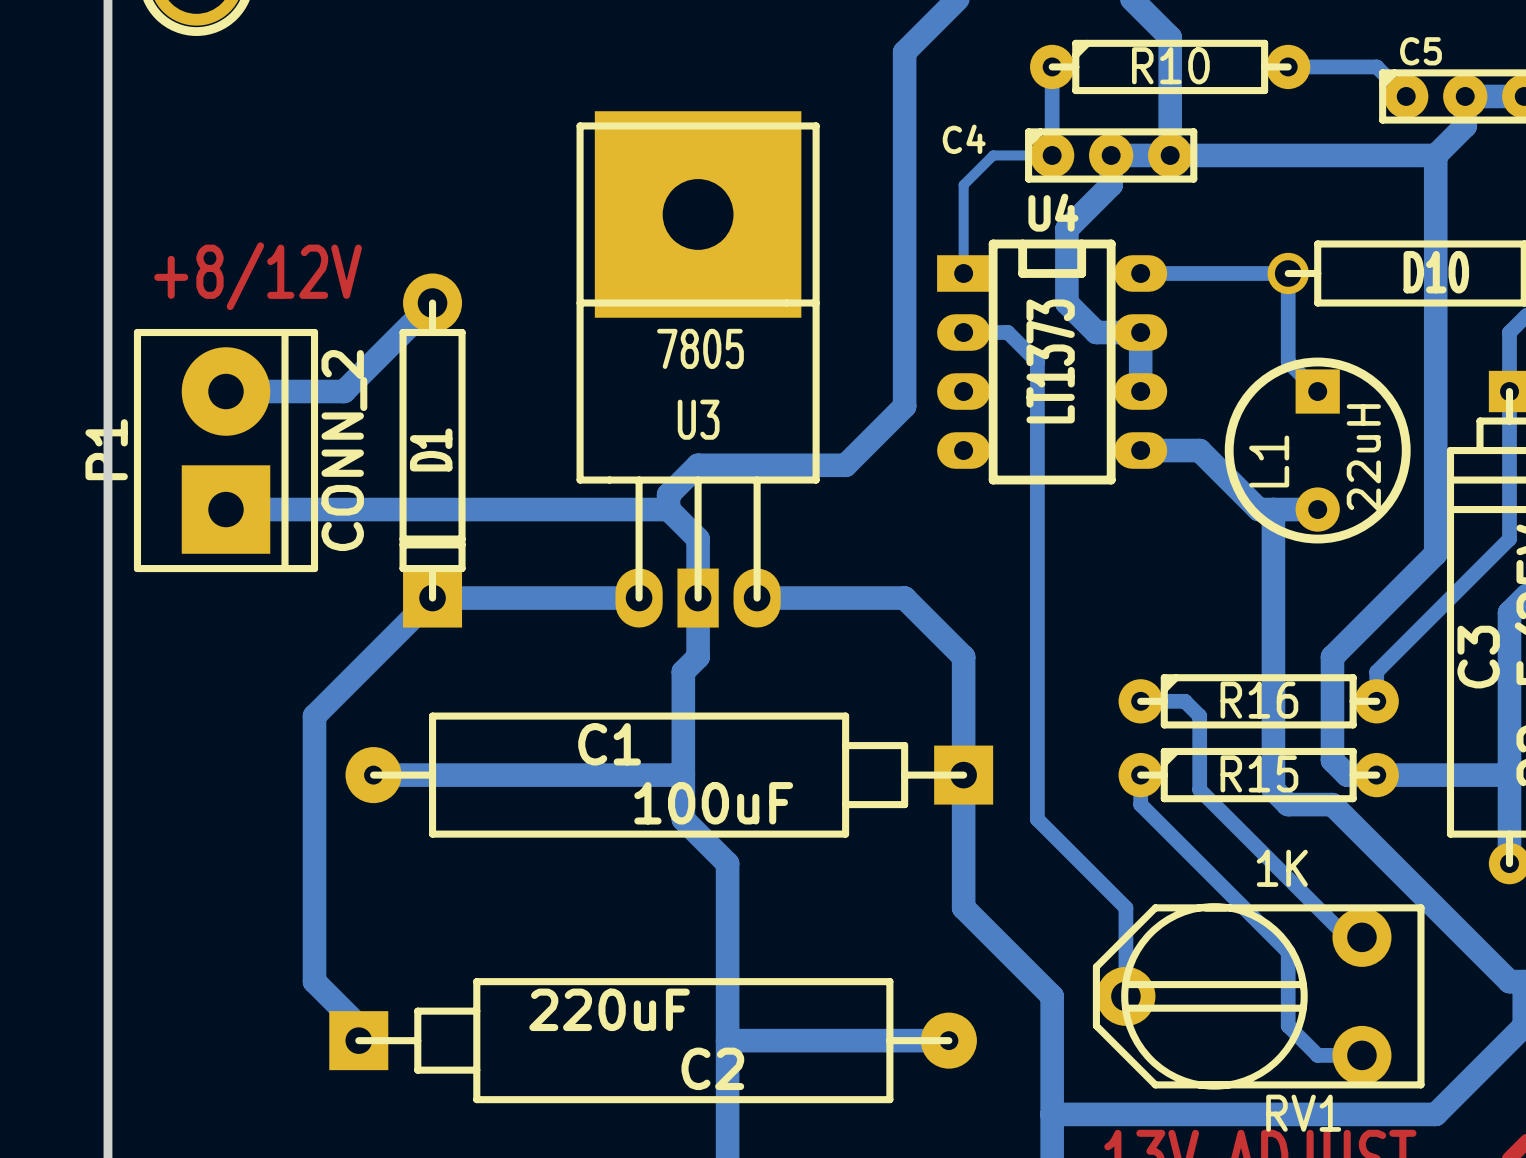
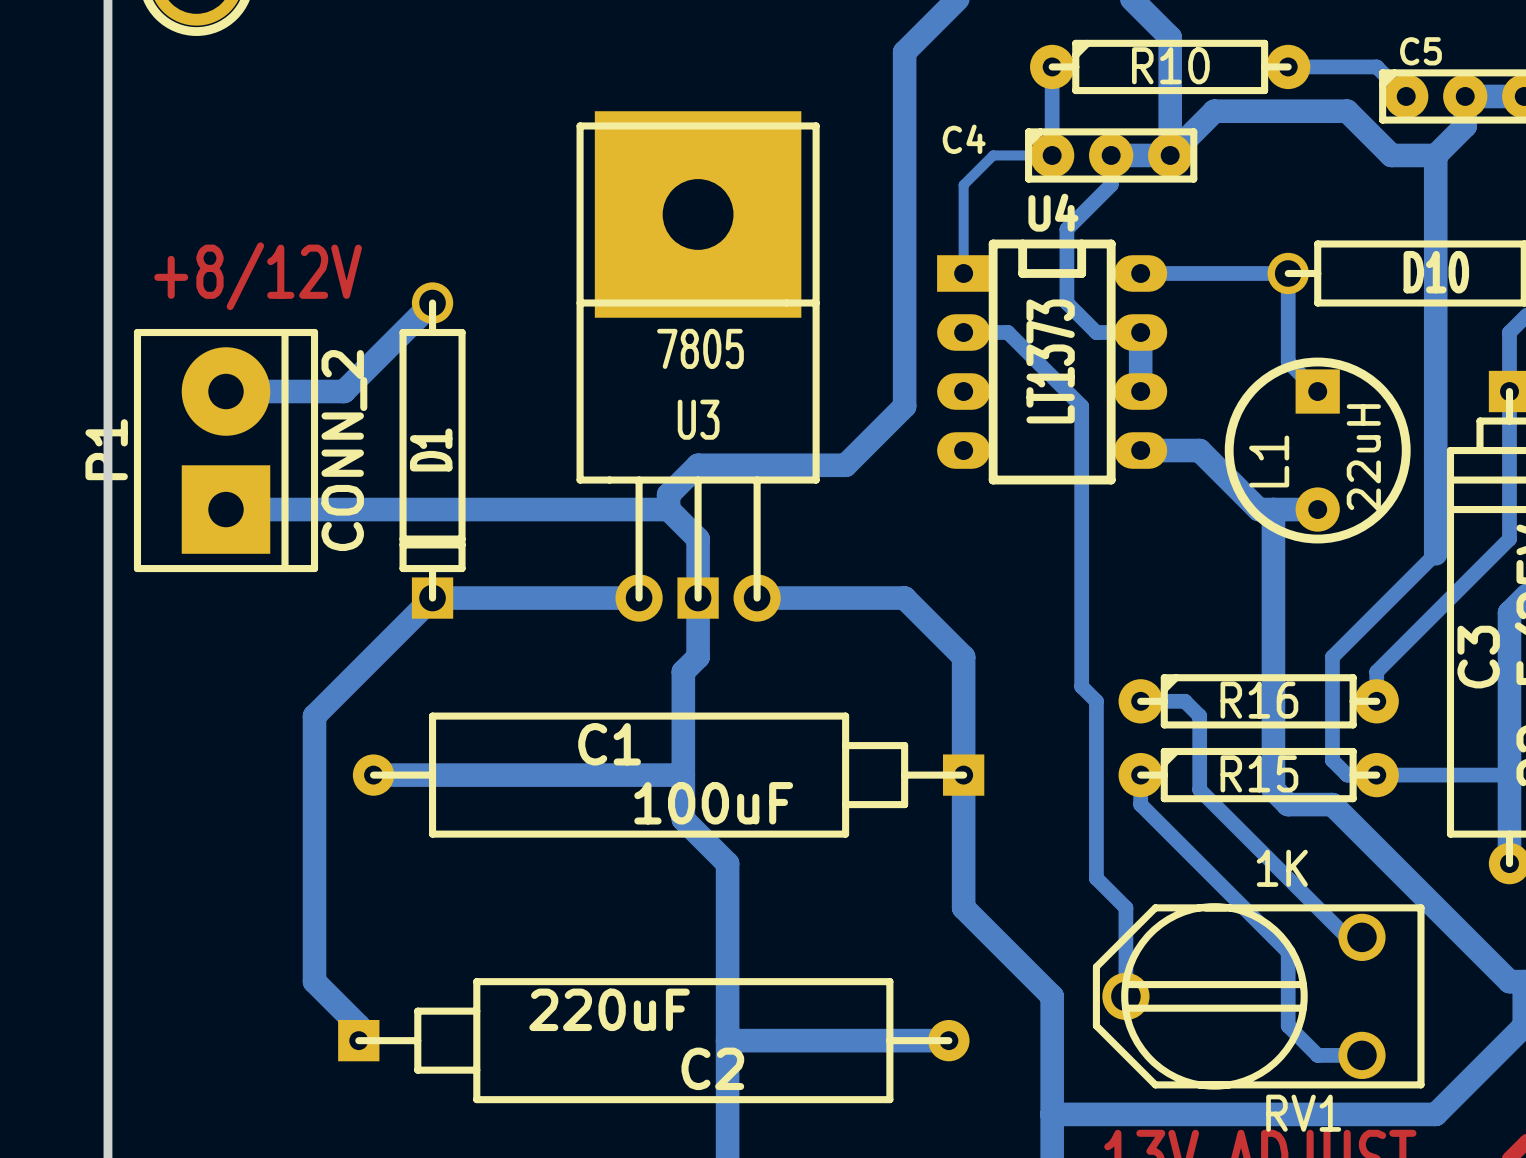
U3 footprint: [576, 111, 820, 628] -> [576, 111, 820, 622]
bottom track width: thick (1111, 155) (1111, 184) (1066, 229) (1066, 303) (1096, 332) (1140, 332) -> thin (1111, 155) (1111, 184) (1066, 229) (1066, 303) (1096, 332) (1140, 332)
bottom track: (1170, 155) (1391, 155) -> (1170, 155) (1214, 111) (1347, 111) (1391, 155)
D1 footprint: [399, 273, 466, 628] -> [399, 282, 466, 619]
bottom track: (1037, 362) (1037, 819) (1096, 878) -> (1037, 362) (1081, 406) (1081, 686) (1096, 701) (1096, 878)
bottom track width: thick (1435, 553) (1332, 657) (1332, 760) (1347, 775) (1509, 775) -> thin (1435, 553) (1332, 657) (1332, 760) (1347, 775) (1509, 775)
C1 footprint: [345, 712, 994, 838] -> [352, 712, 985, 838]
RV1 footprint: [1092, 903, 1425, 1090] -> [1092, 903, 1425, 1090]
C2 footprint: [329, 978, 977, 1104] -> [338, 978, 970, 1104]

